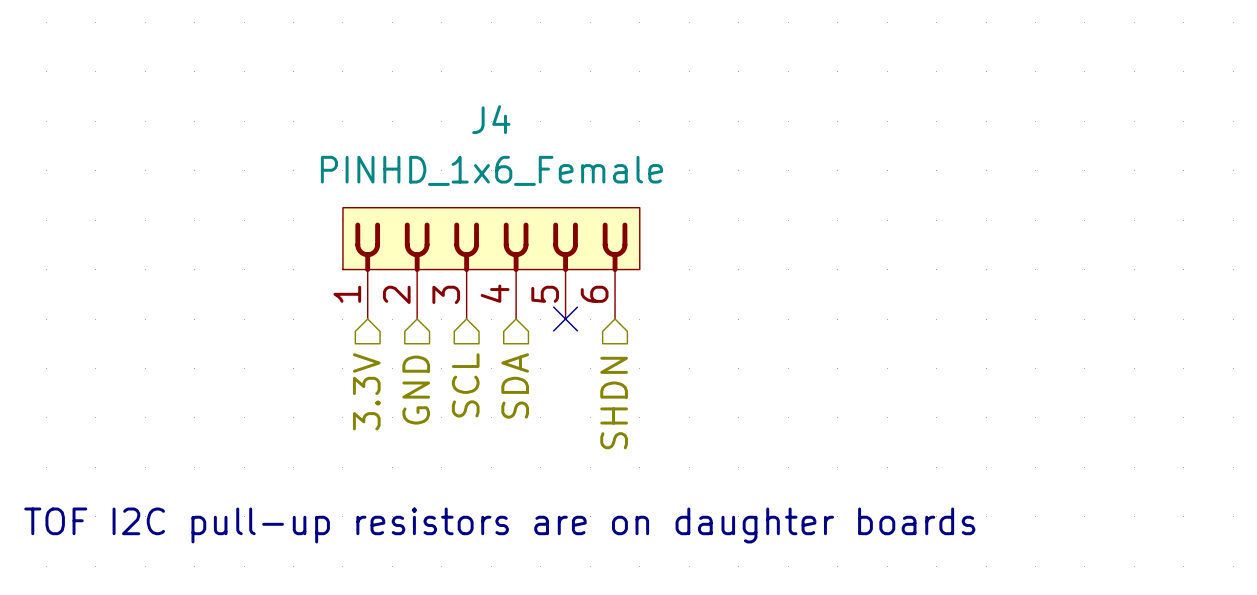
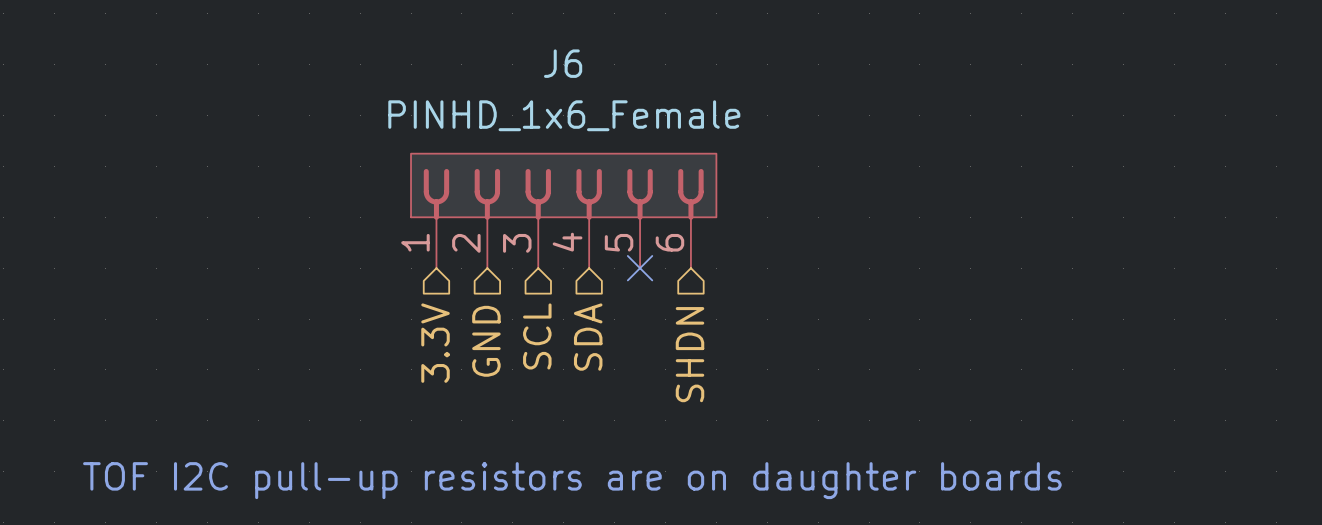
J4 name: J4 (491, 119) -> J6 (563, 63)

